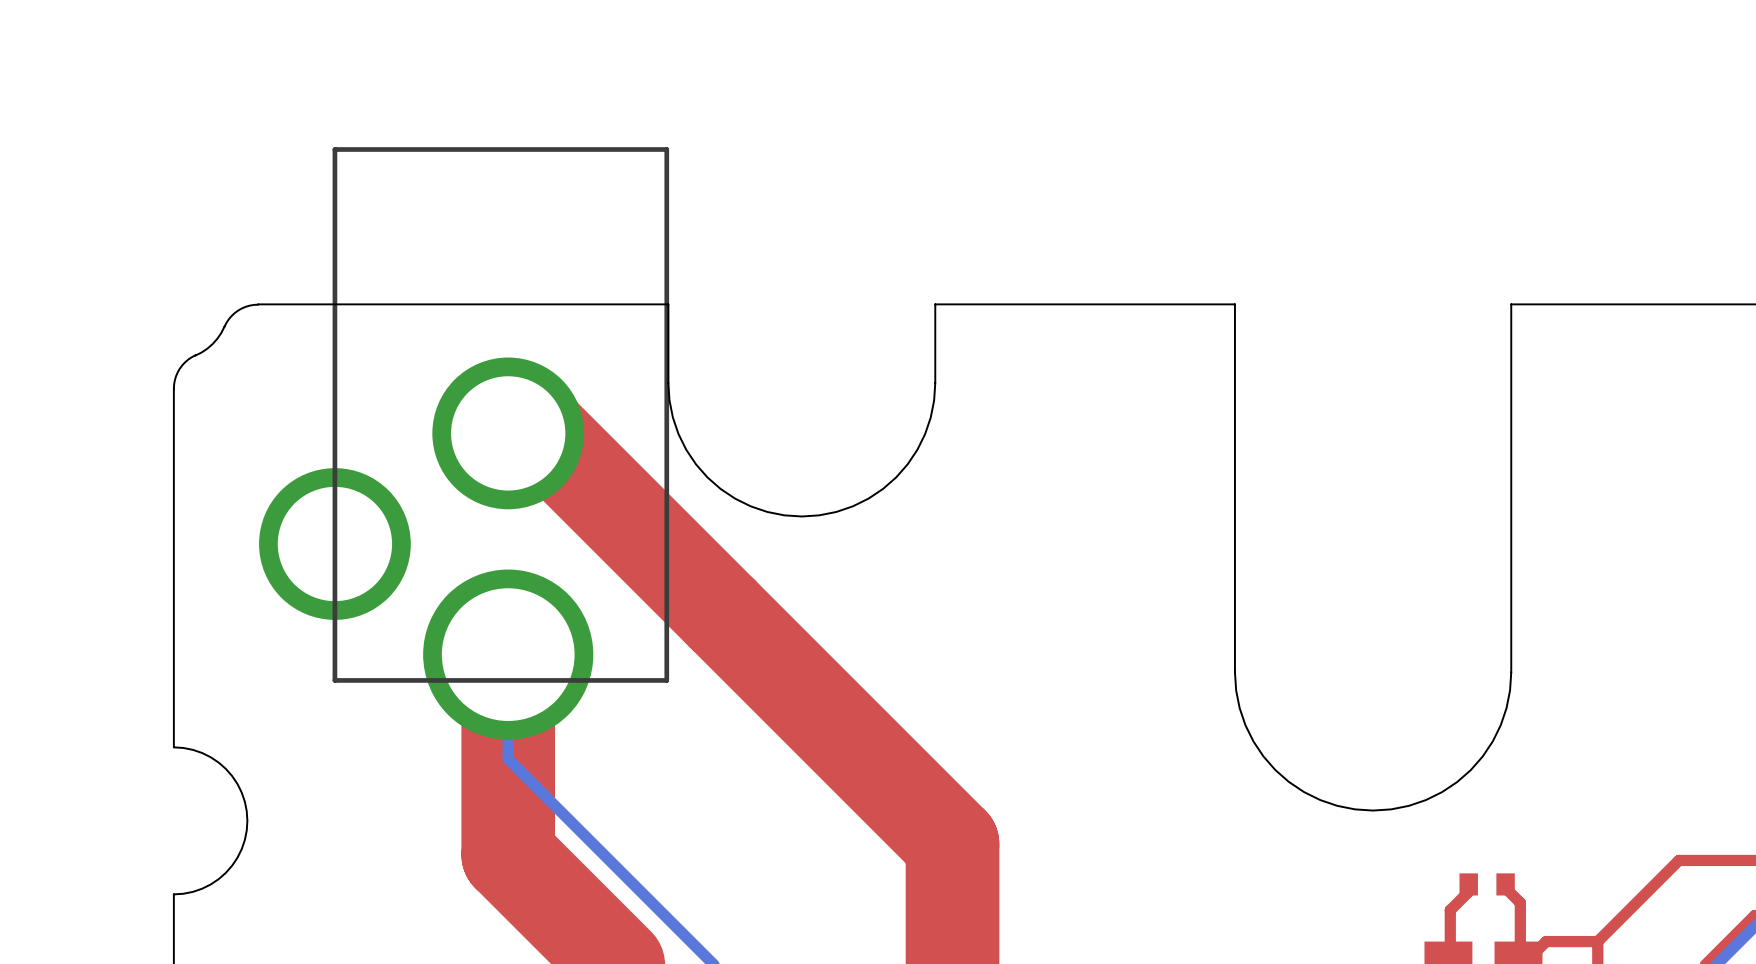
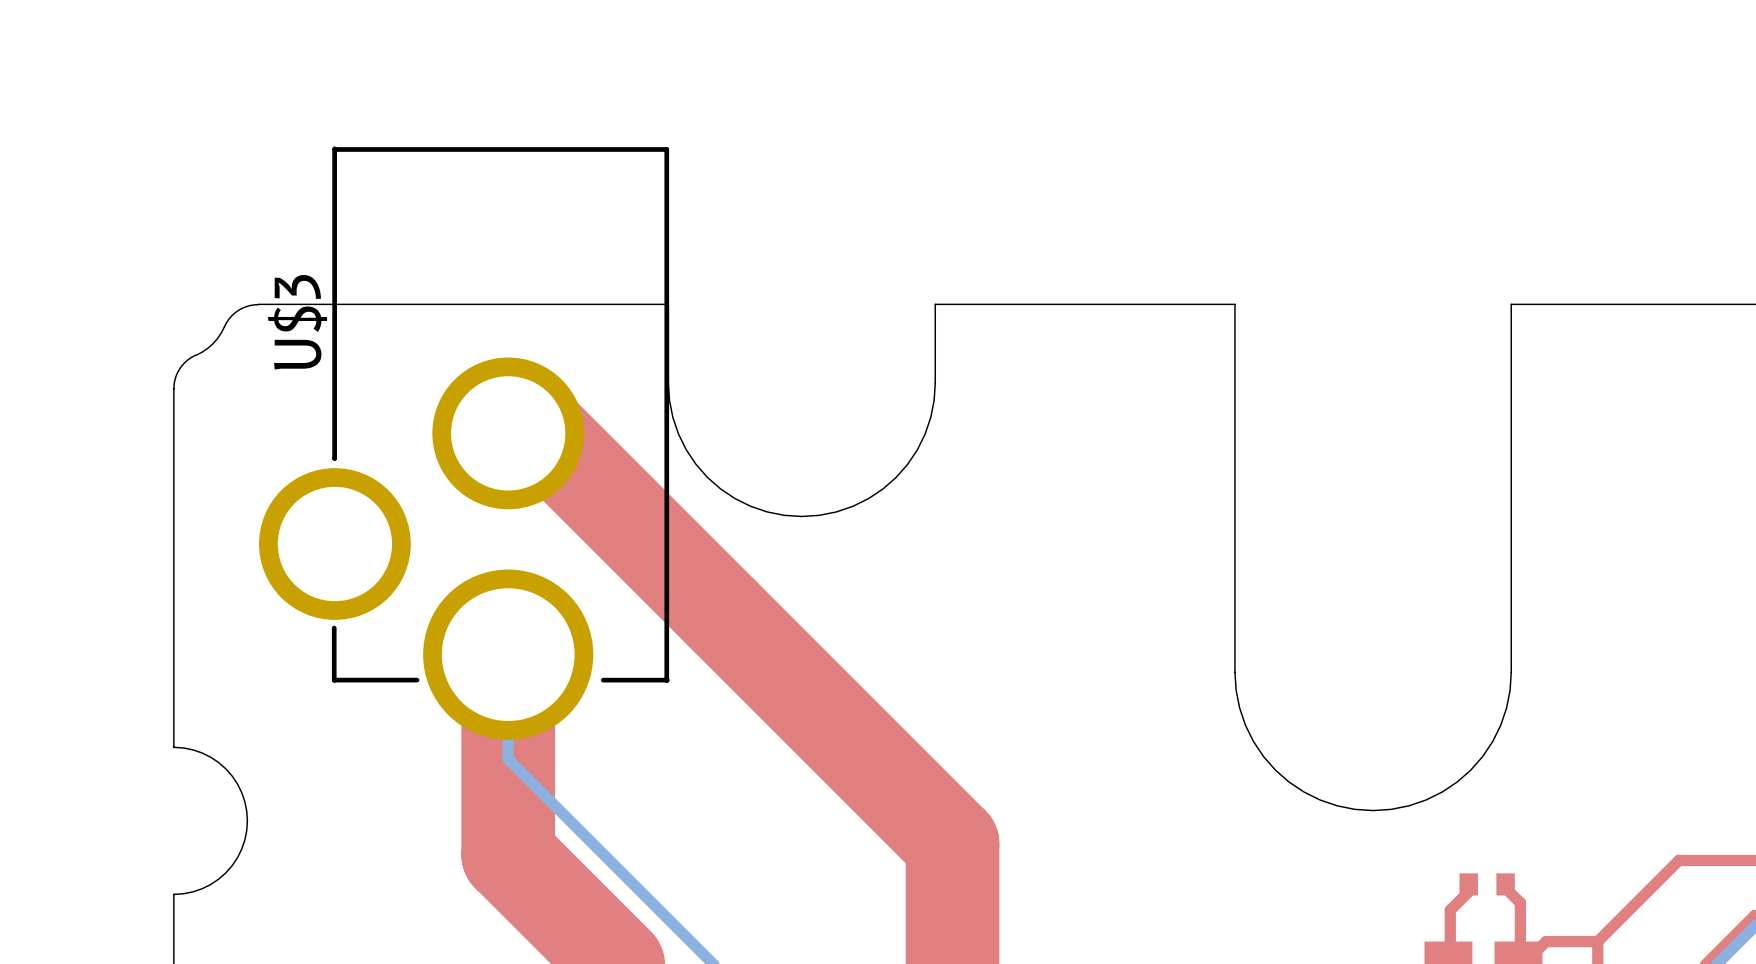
part: (464, 443) -> none
U$3: none -> (464, 443)

